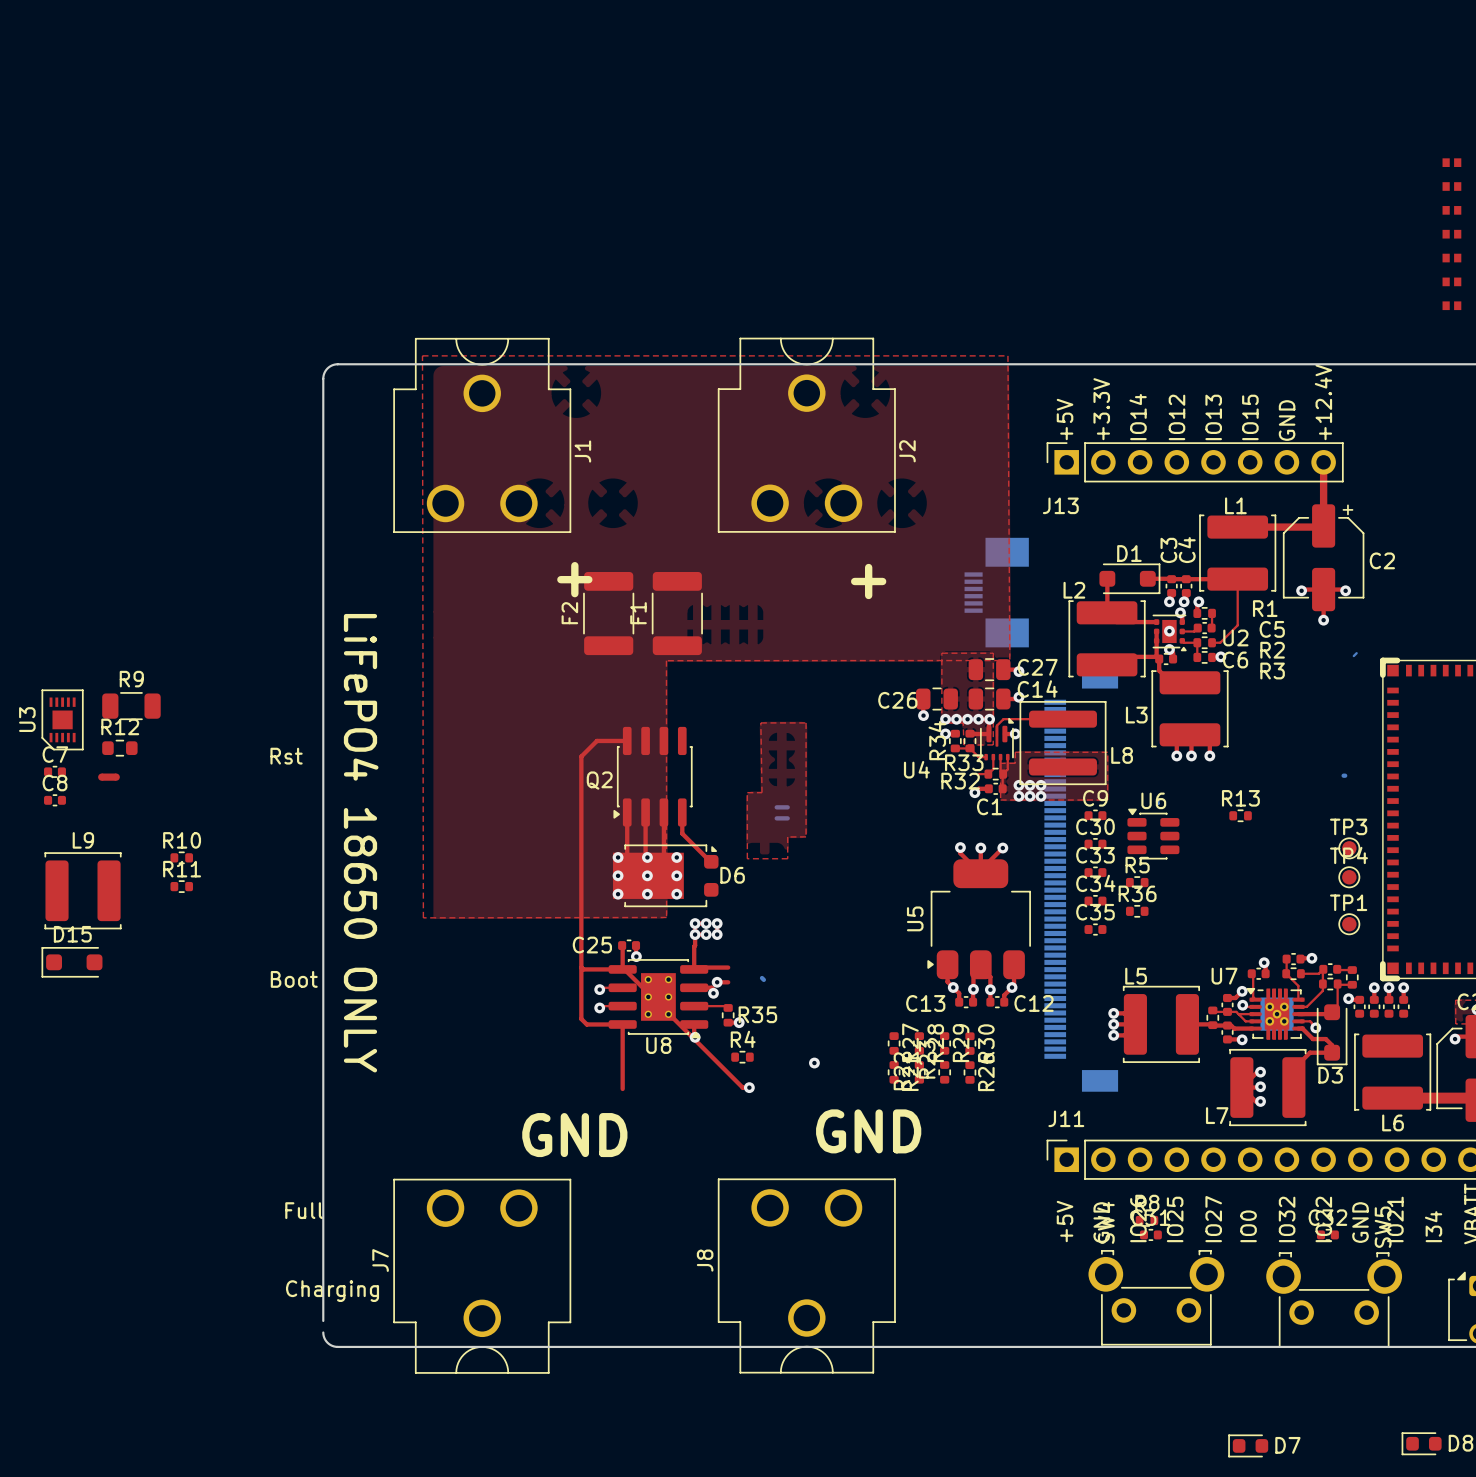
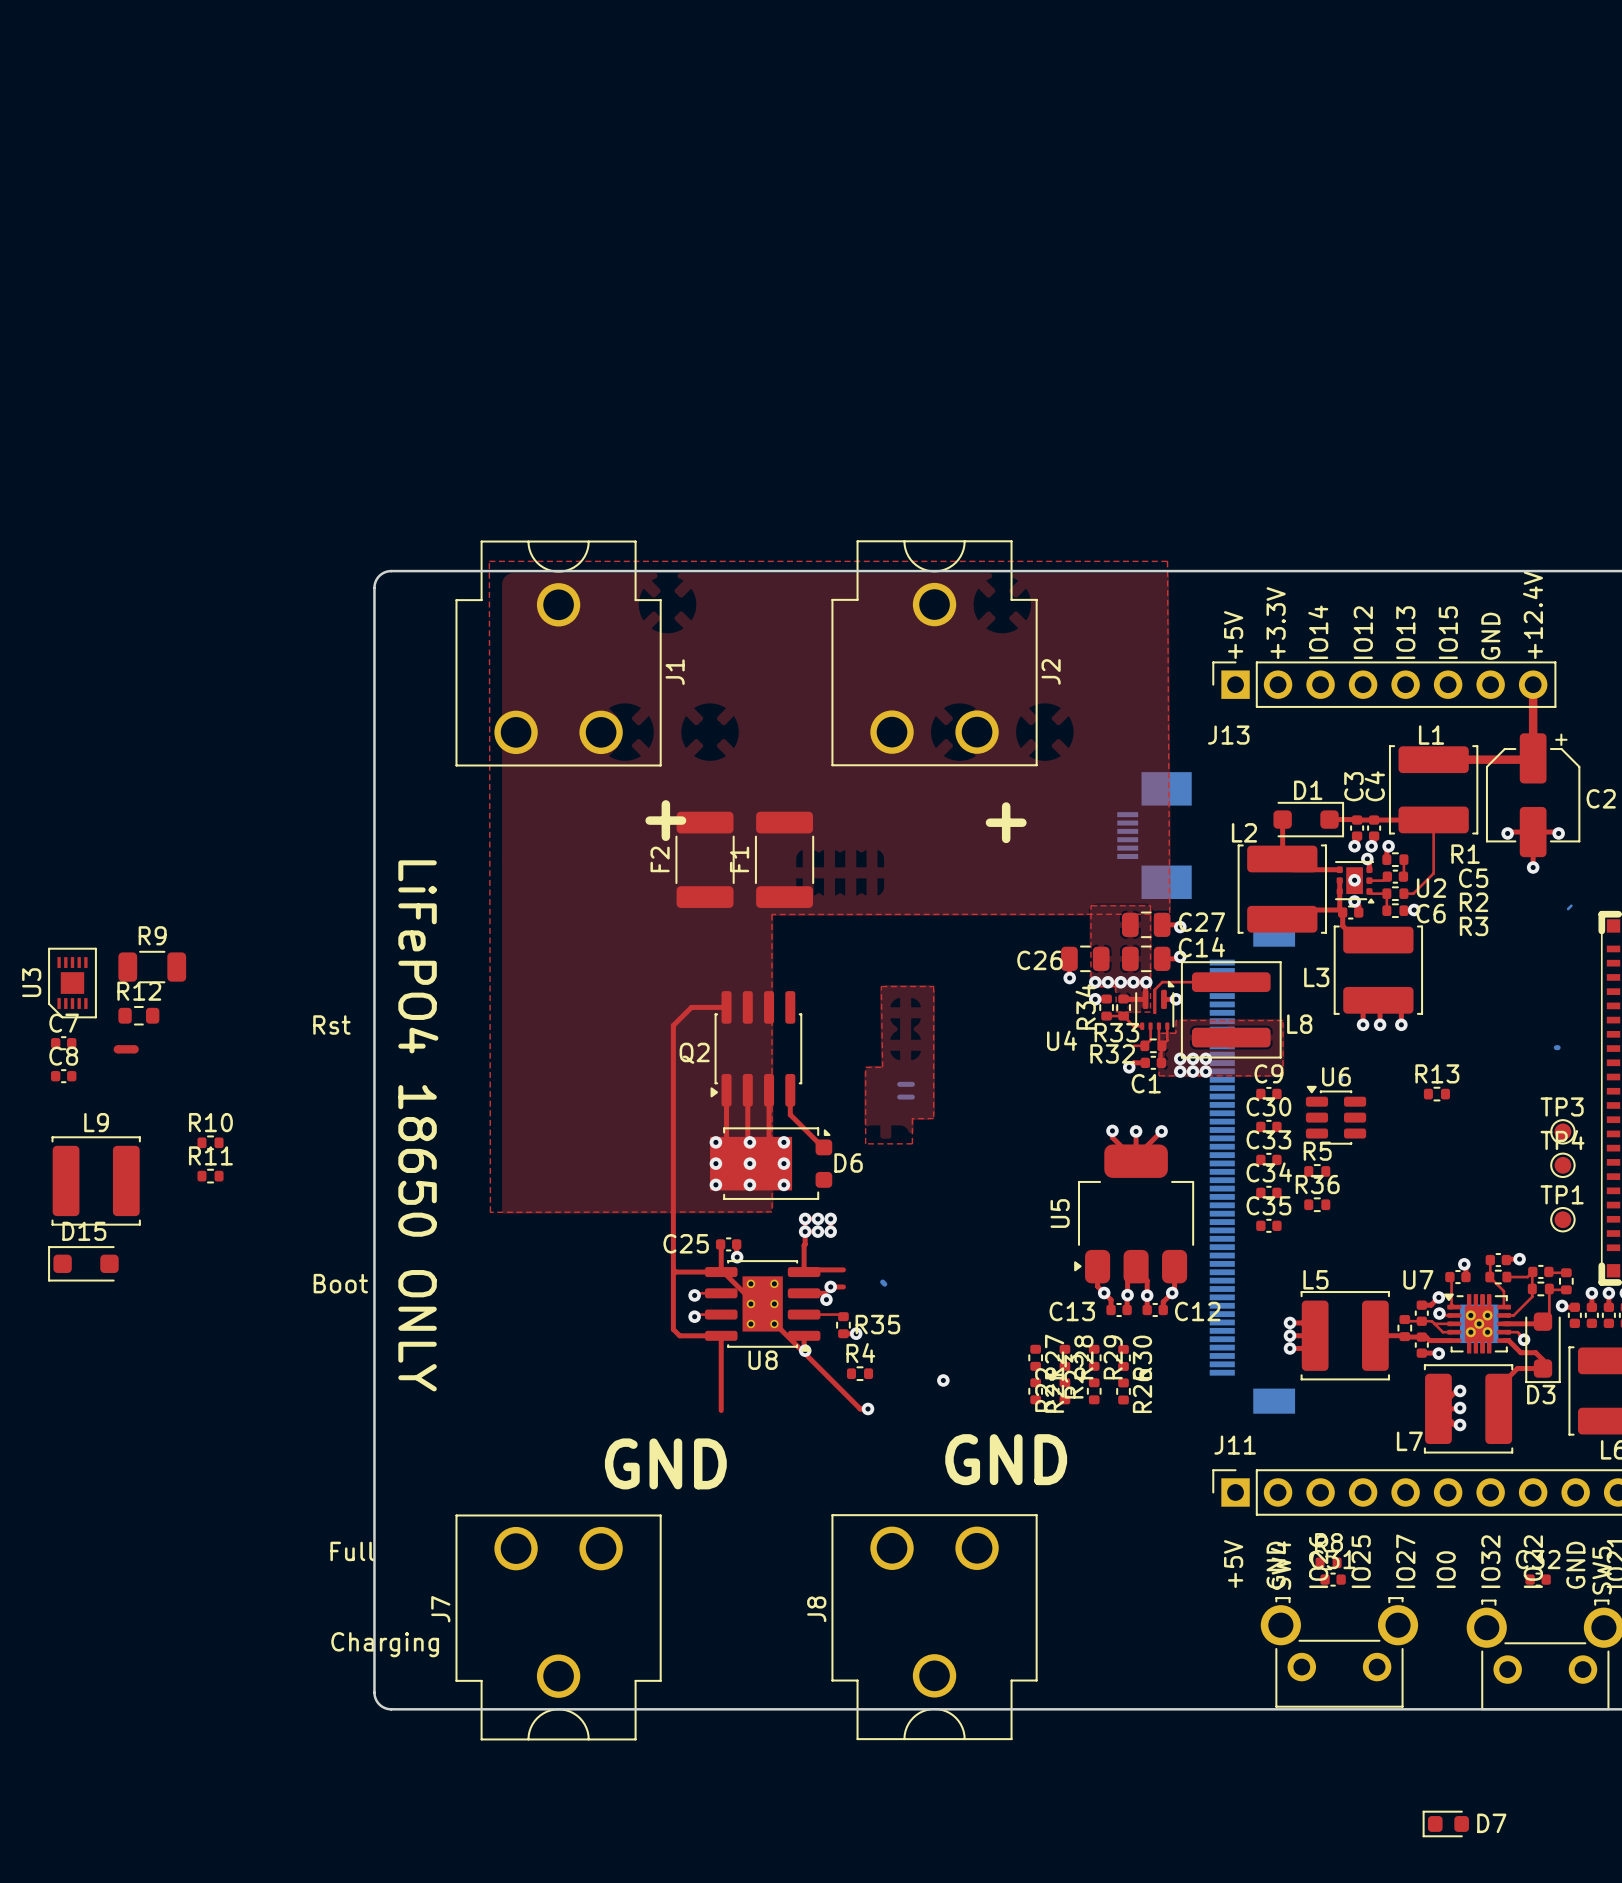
board edge: none -> (374, 1679) (374, 1692)

